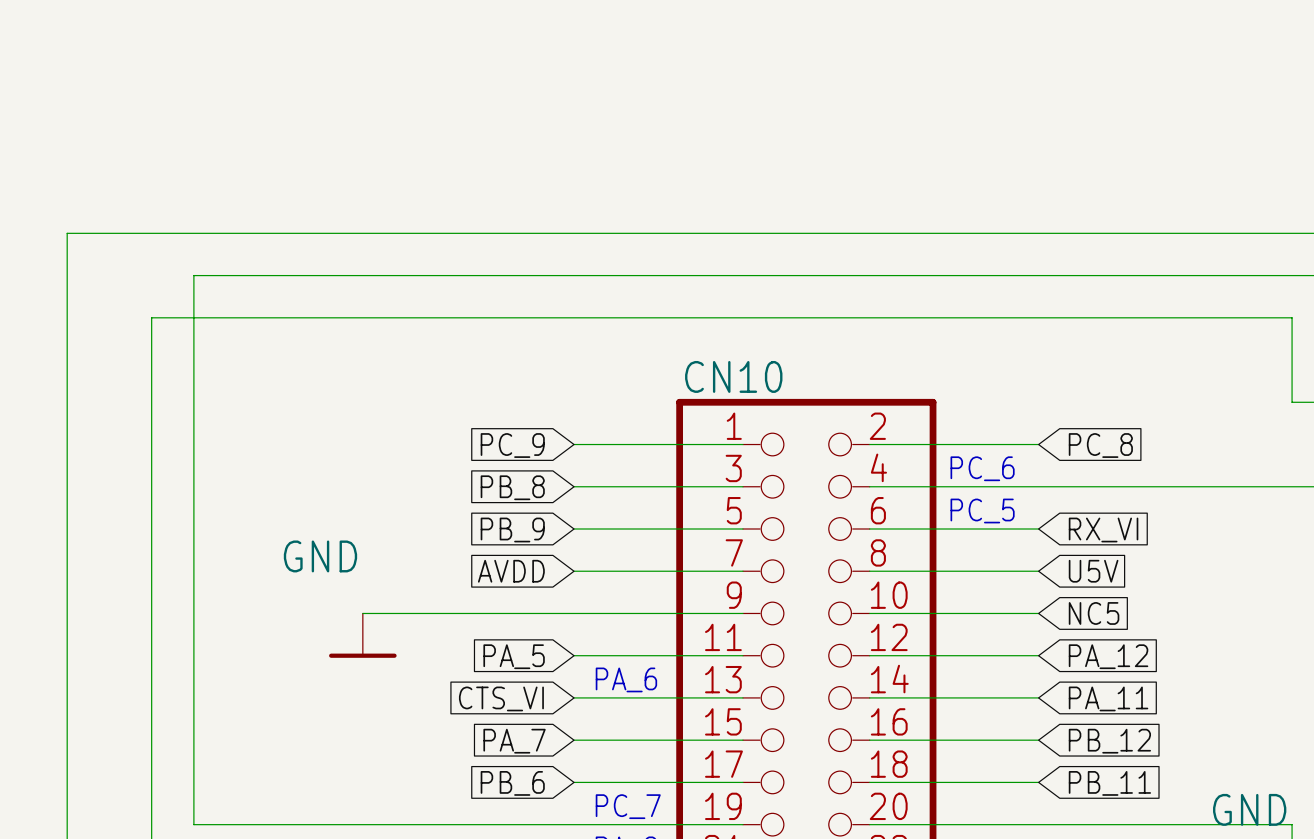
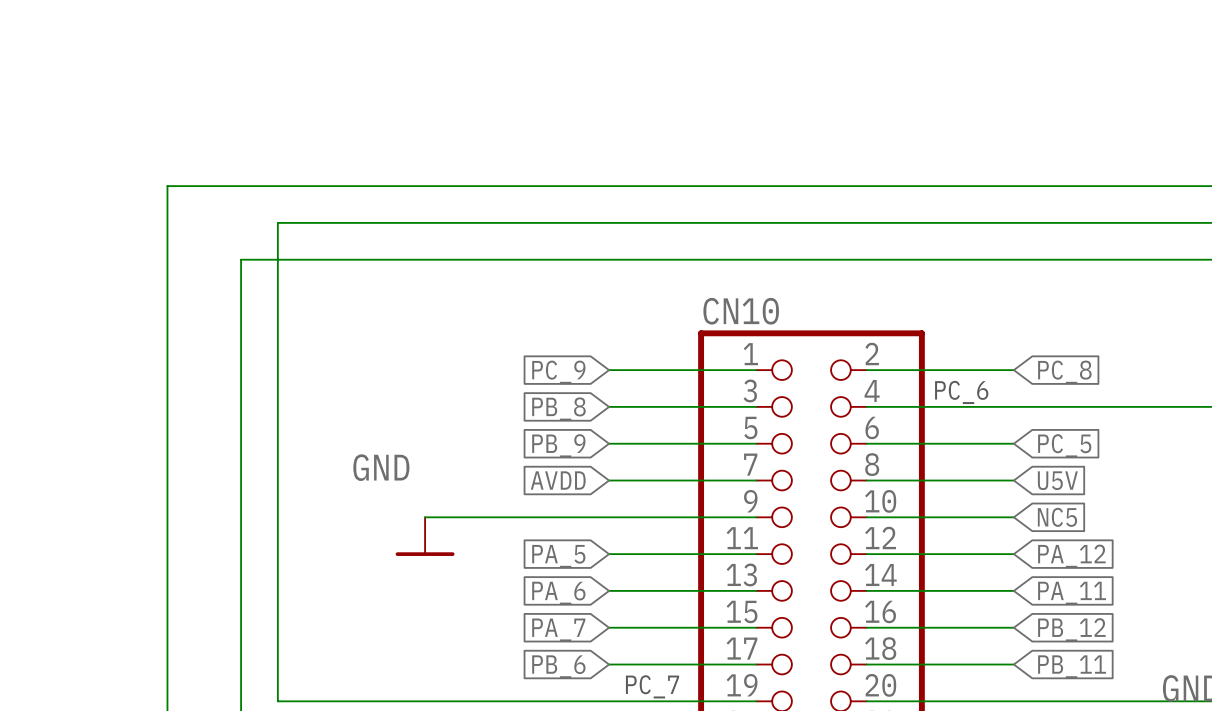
text: PC_5 (982, 510) -> none
global label: RX_VI (1103, 530) -> PC_5 (1064, 445)
text: PA_6 (626, 679) -> none
global label: CTS_VI (501, 698) -> PA_6 (558, 593)

